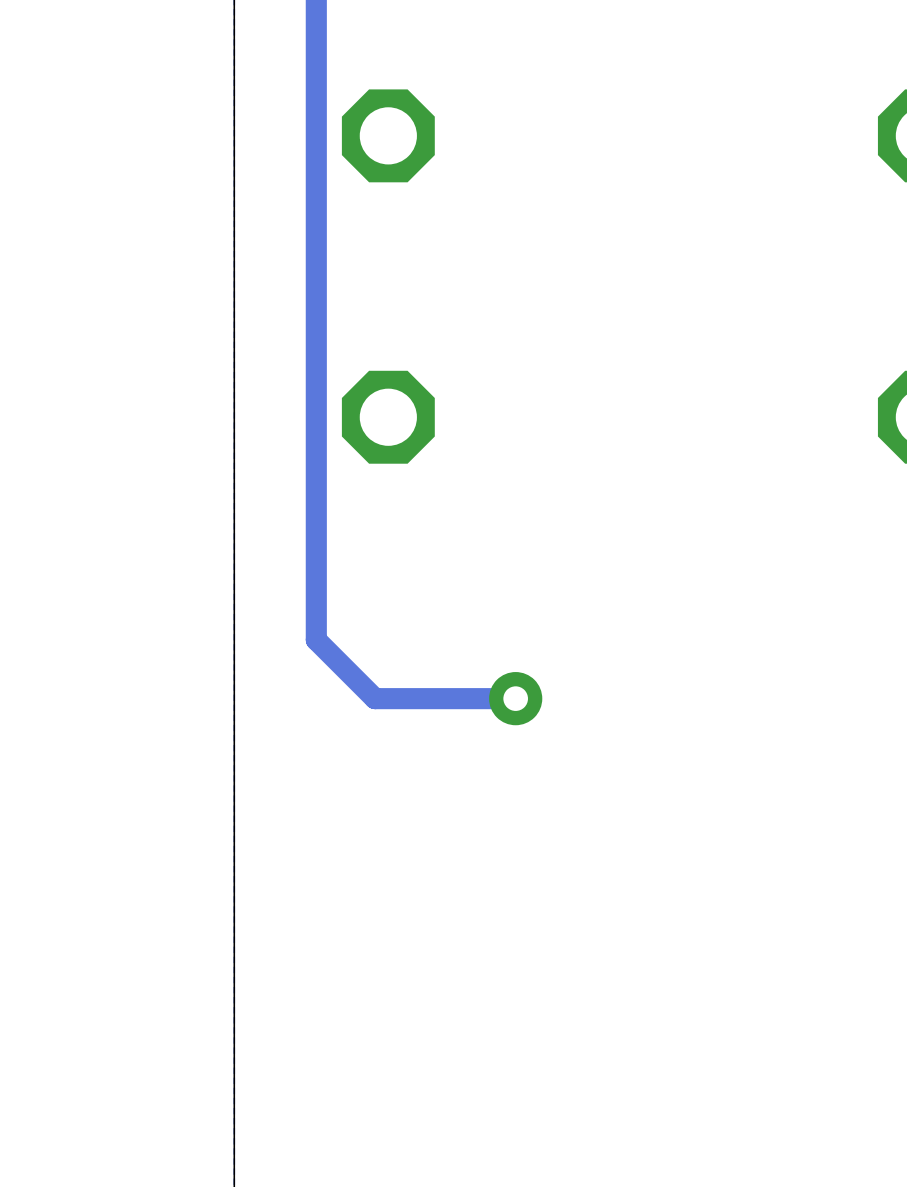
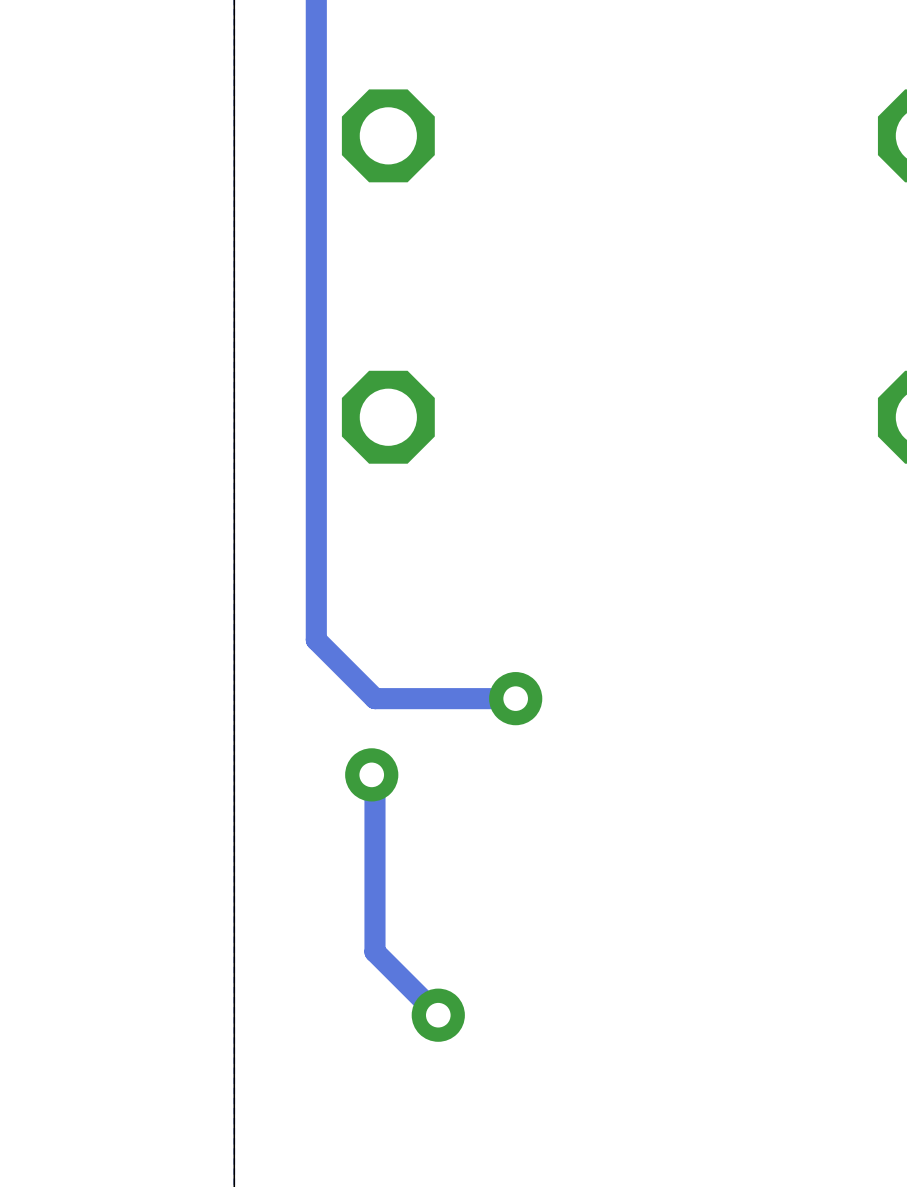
track: none -> (374, 768) (374, 951) (438, 1015)
via: none -> (371, 774)
via: none -> (438, 1015)

